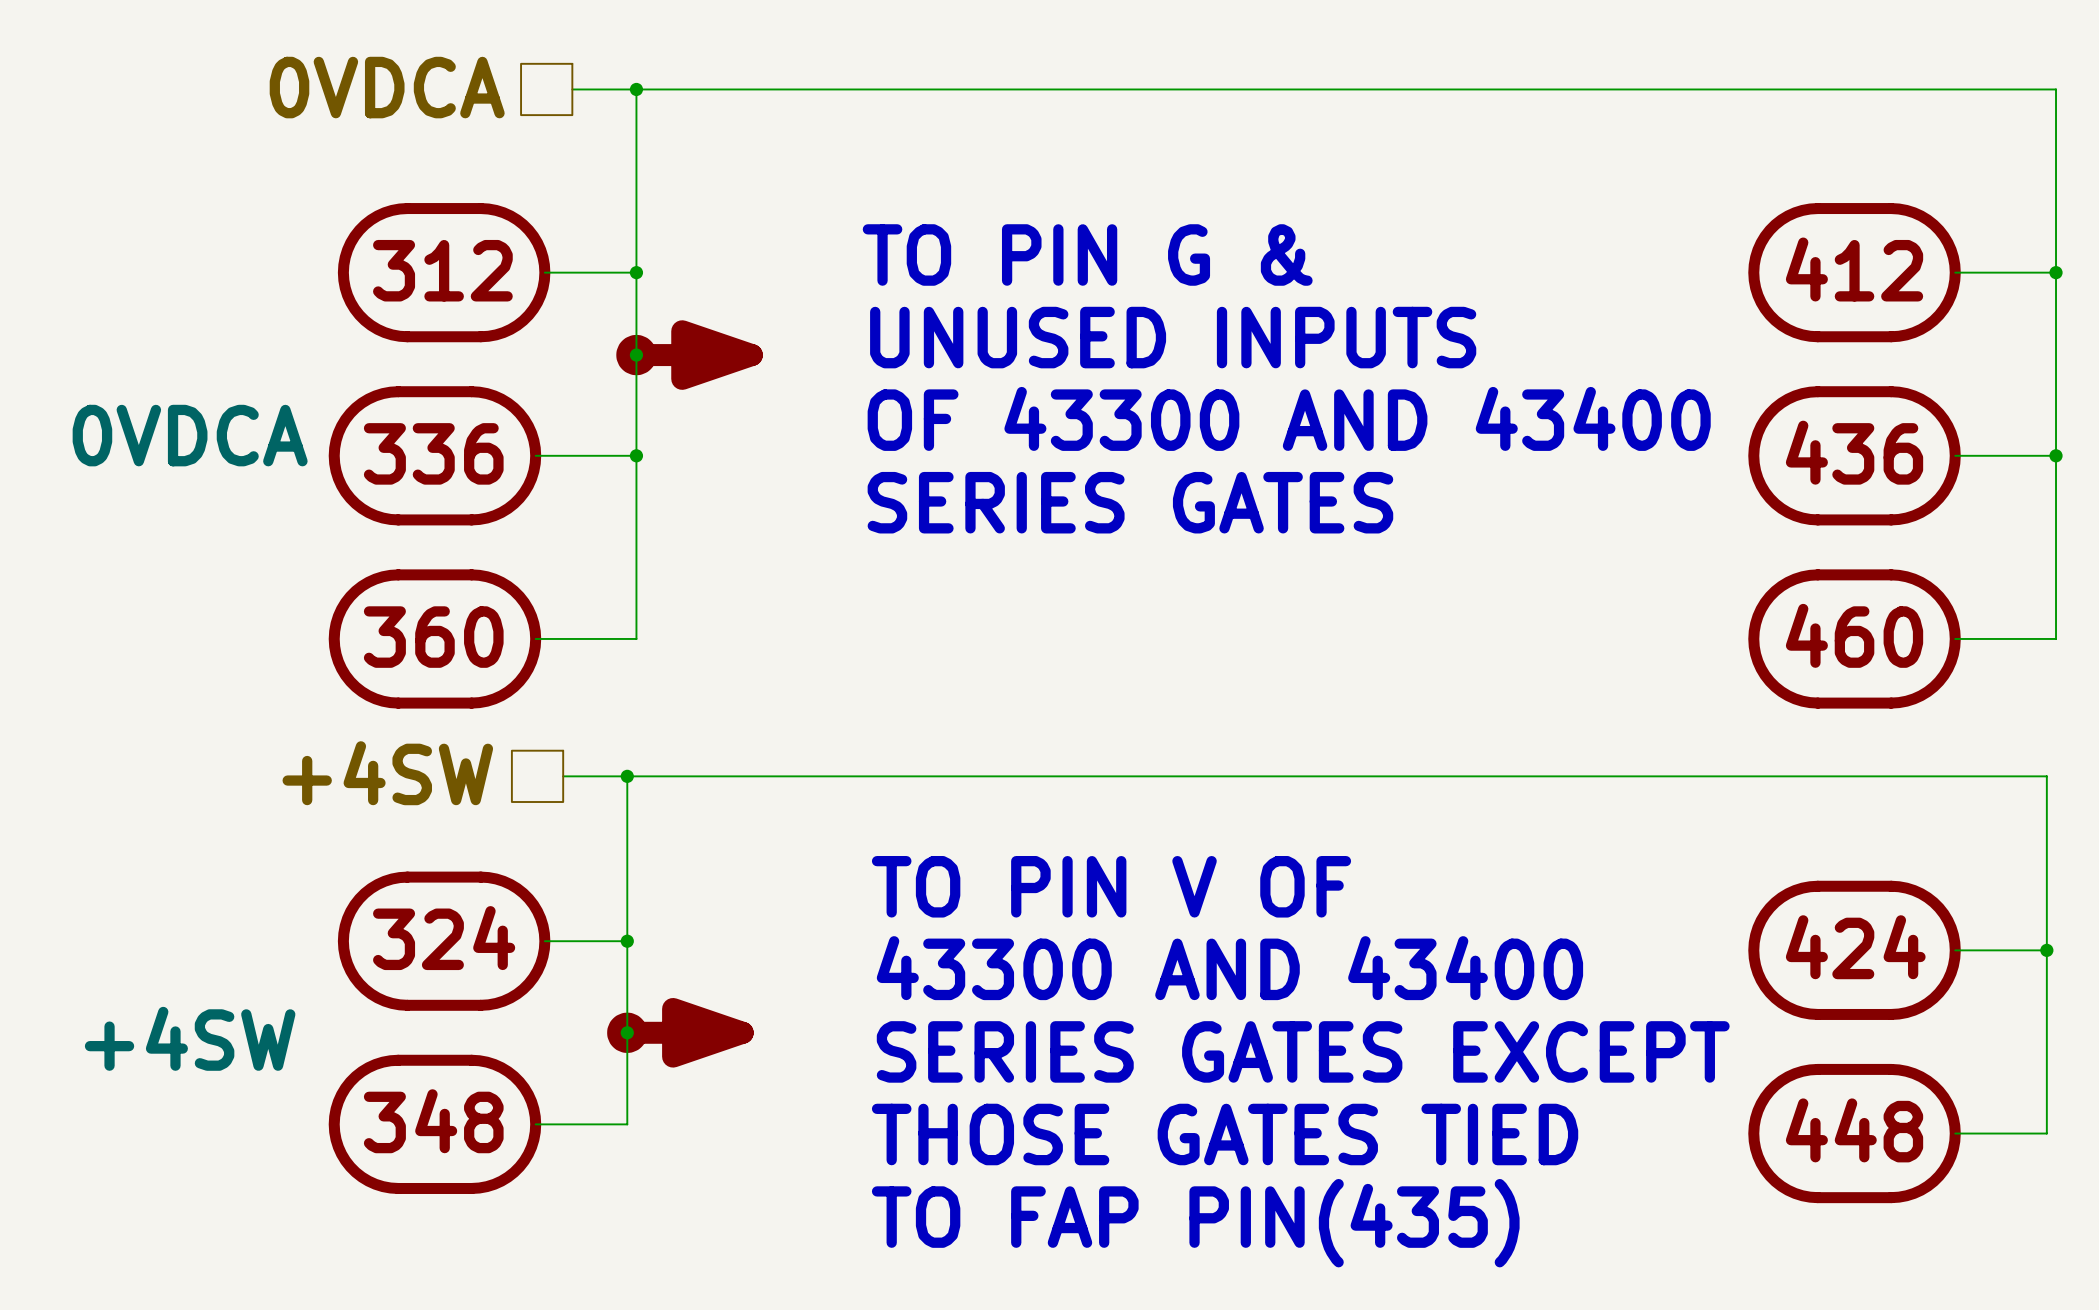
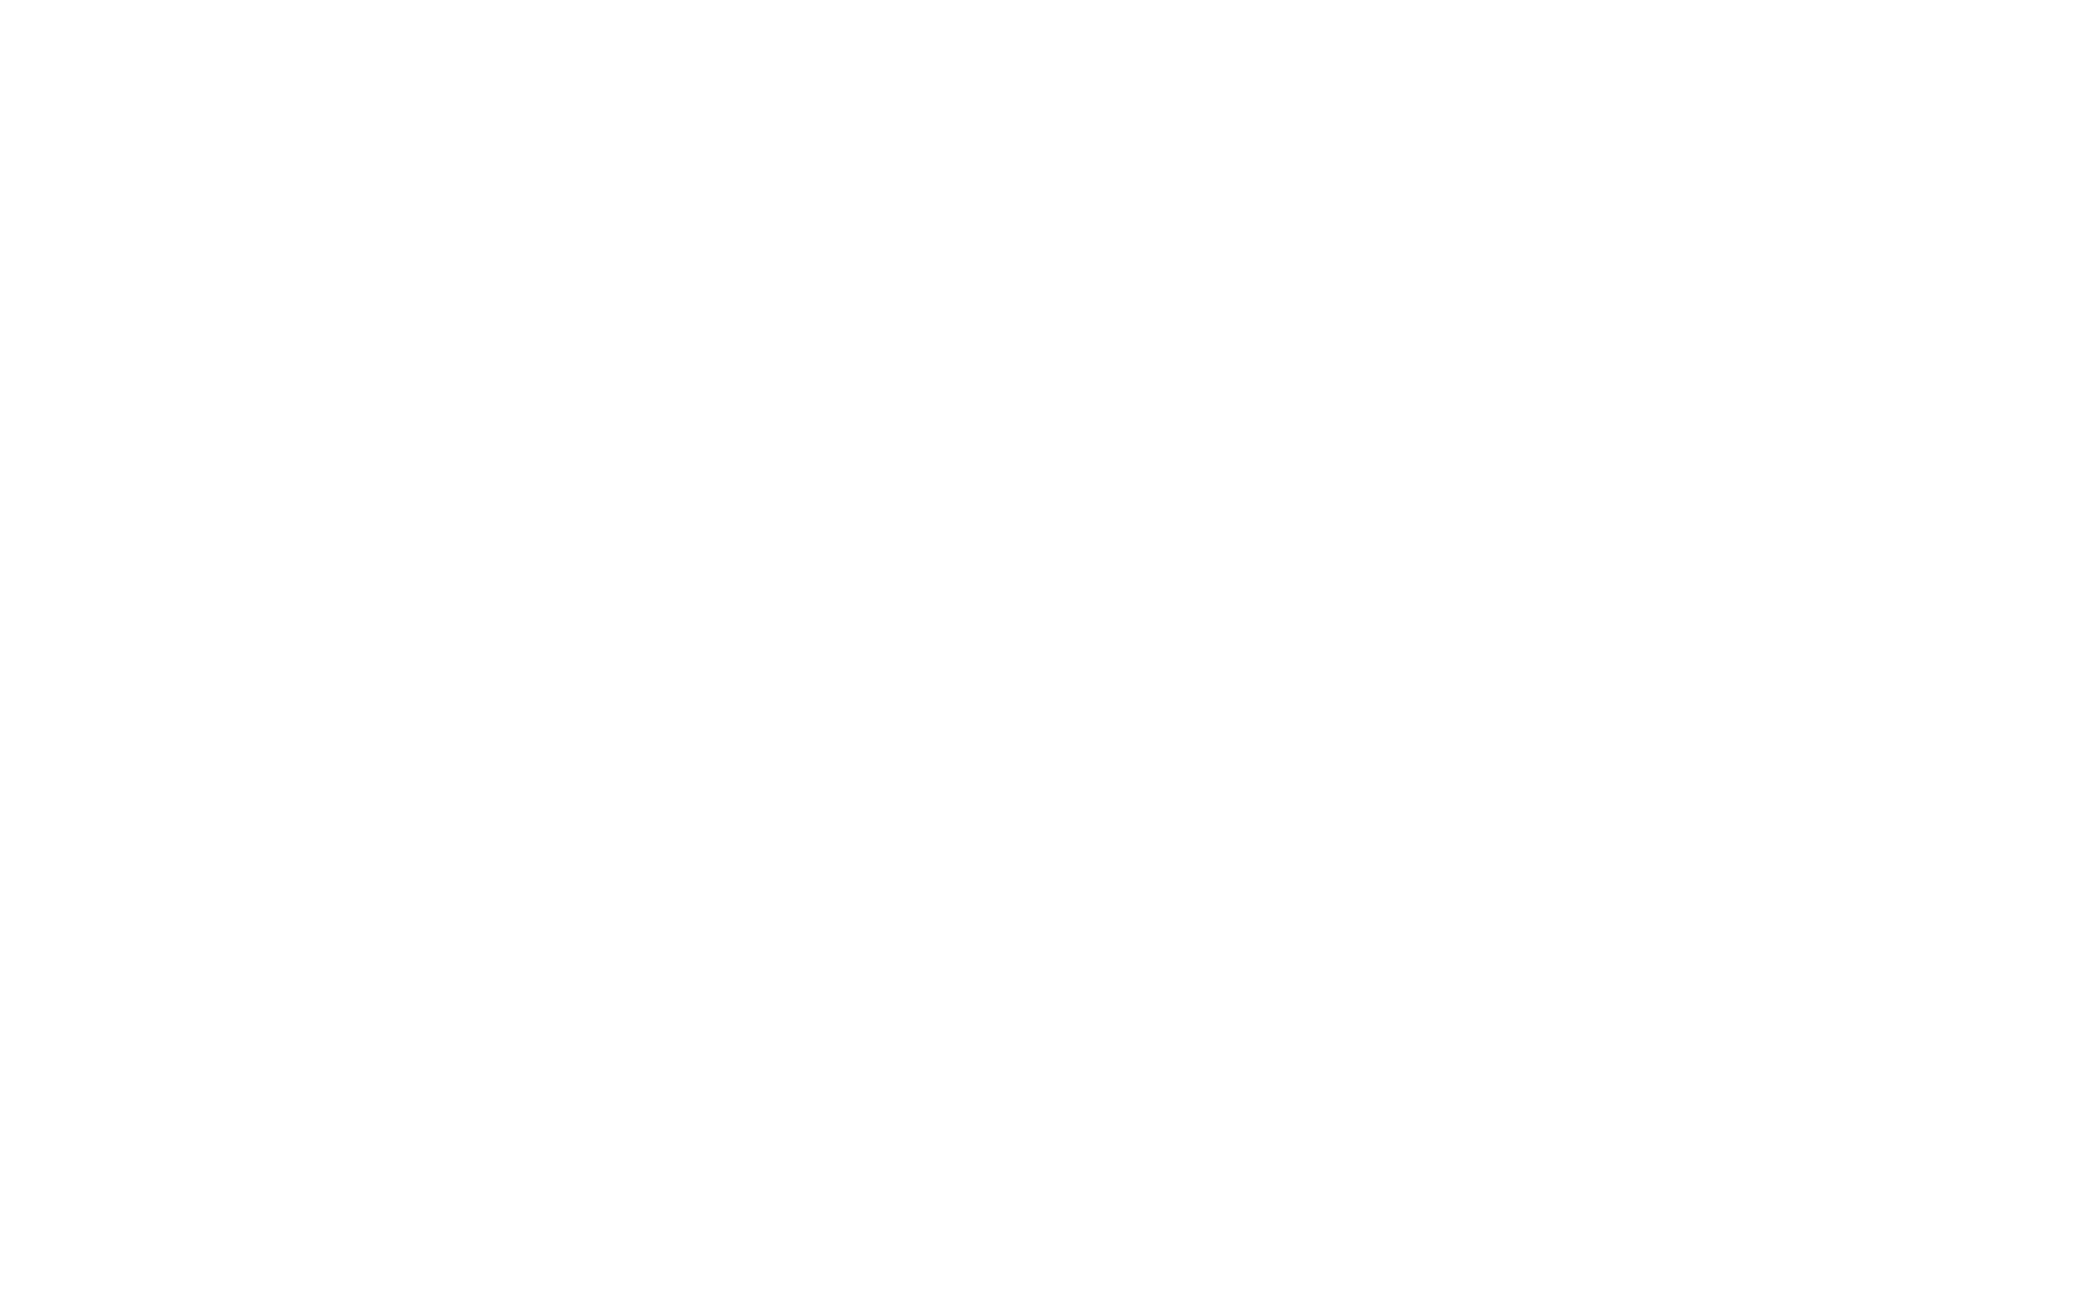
hierarchical label: 0VDCA (387, 87) -> none
wire: (572, 89) (2056, 89) (2056, 638) (1955, 638) -> none
wire: (636, 89) (636, 638) (535, 638) -> none
junction: (636, 89) -> none
text: TO PIN G & (1087, 254) -> none
part: (444, 272) -> none
wire: (544, 272) (636, 272) -> none
junction: (636, 272) -> none
part: (1854, 272) -> none
wire: (1955, 272) (2056, 272) -> none
junction: (2056, 272) -> none
text: UNUSED INPUTS (1173, 337) -> none
junction: (636, 355) -> none
part: (689, 355) -> none
text: OF 43300 AND 43400 (1289, 418) -> none
part: (434, 455) -> none
wire: (535, 455) (636, 455) -> none
junction: (636, 455) -> none
part: (1854, 455) -> none
wire: (1955, 455) (2056, 455) -> none
junction: (2056, 455) -> none
text: SERIES GATES (1130, 502) -> none
part: (434, 638) -> none
part: (1854, 638) -> none
hierarchical label: +4SW (387, 773) -> none
wire: (563, 776) (2046, 776) (2046, 1133) (1955, 1133) -> none
wire: (627, 776) (627, 1124) (535, 1124) -> none
junction: (627, 776) -> none
text: TO PIN V OF (1111, 886) -> none
part: (444, 941) -> none
wire: (544, 941) (627, 941) -> none
junction: (627, 941) -> none
part: (1854, 950) -> none
wire: (1955, 950) (2046, 950) -> none
junction: (2046, 950) -> none
text: 43300 AND 43400 (1229, 968) -> none
junction: (627, 1032) -> none
part: (680, 1032) -> none
text: SERIES GATES EXCEPT (1303, 1051) -> none
part: (434, 1124) -> none
part: (1854, 1133) -> none
text: THOSE GATES TIED (1225, 1134) -> none
text: TO FAP PIN(435) (1195, 1223) -> none

